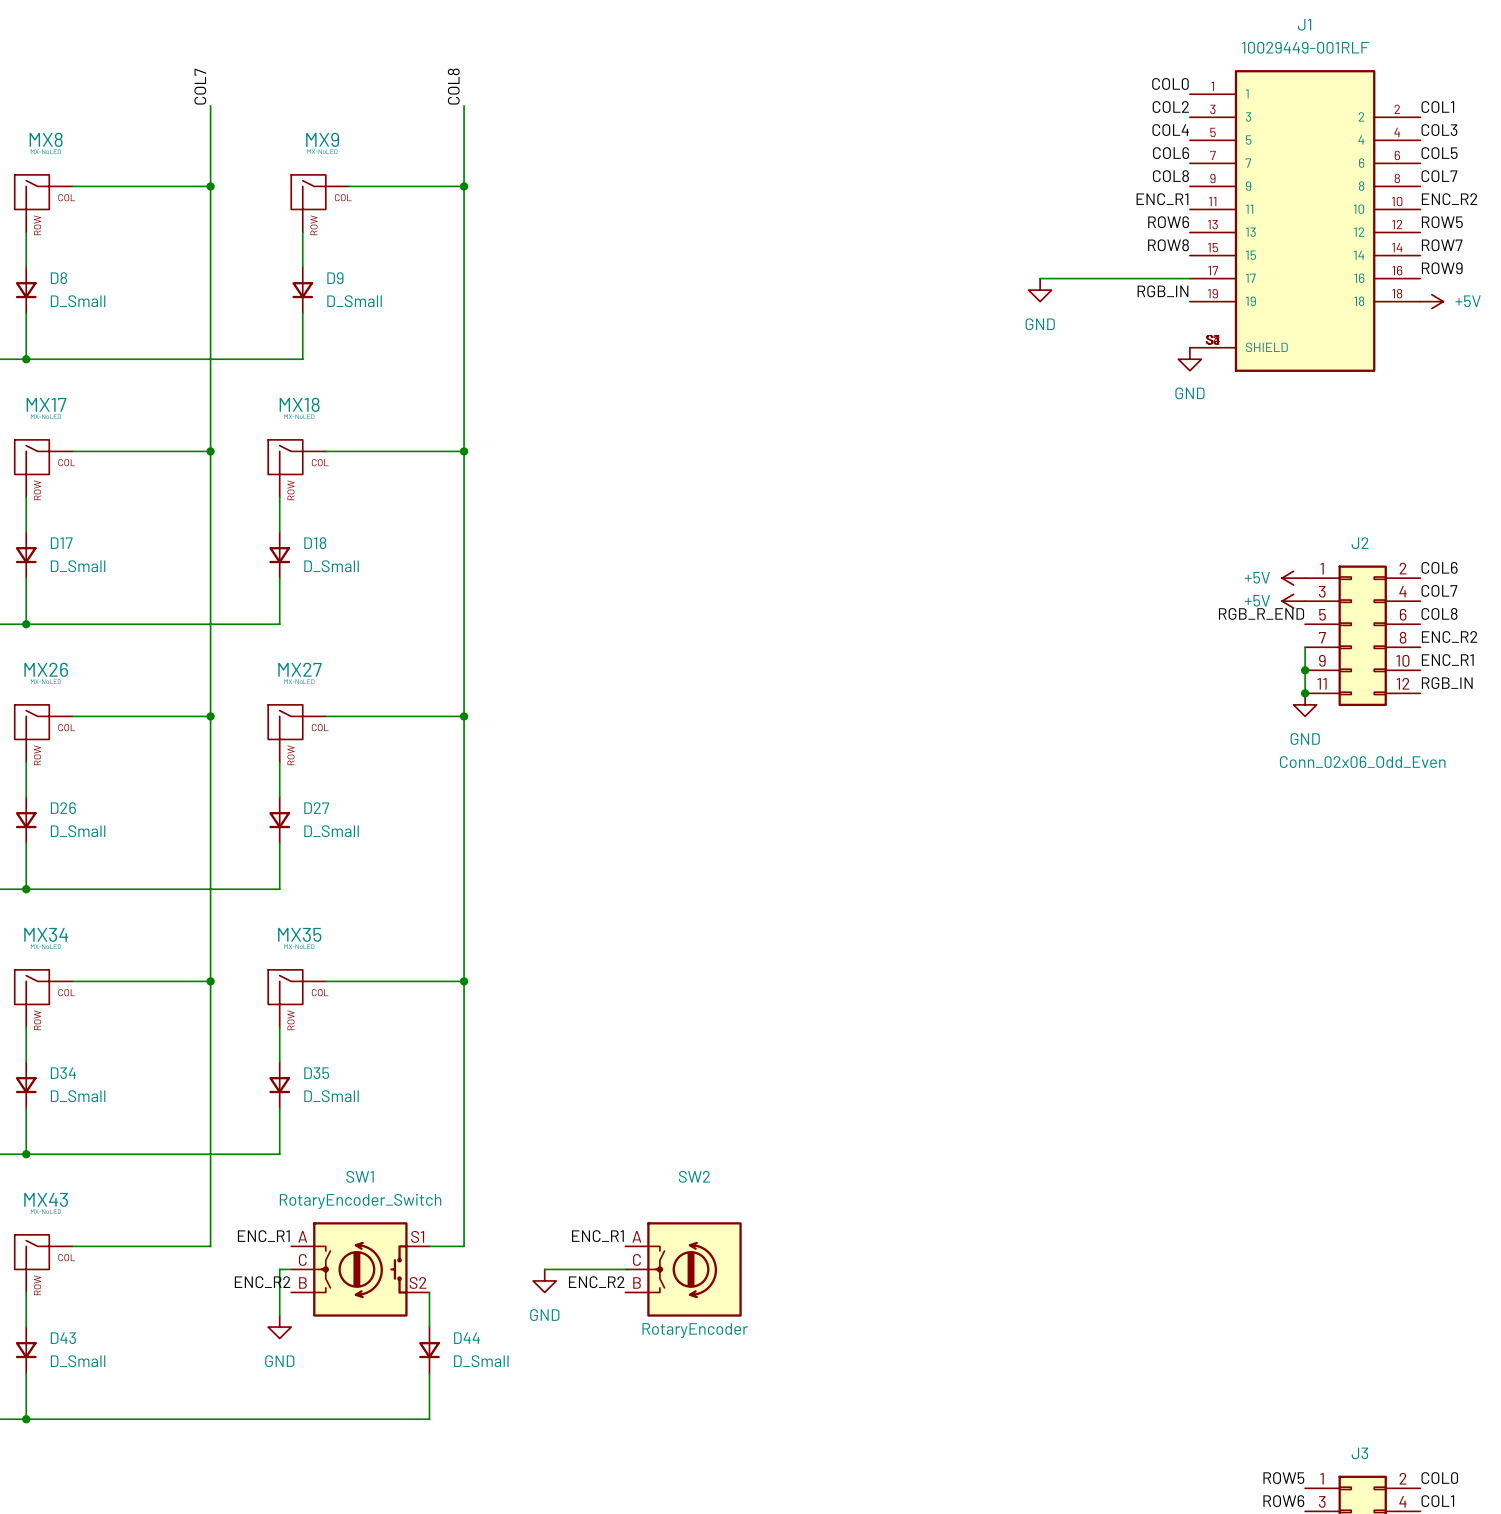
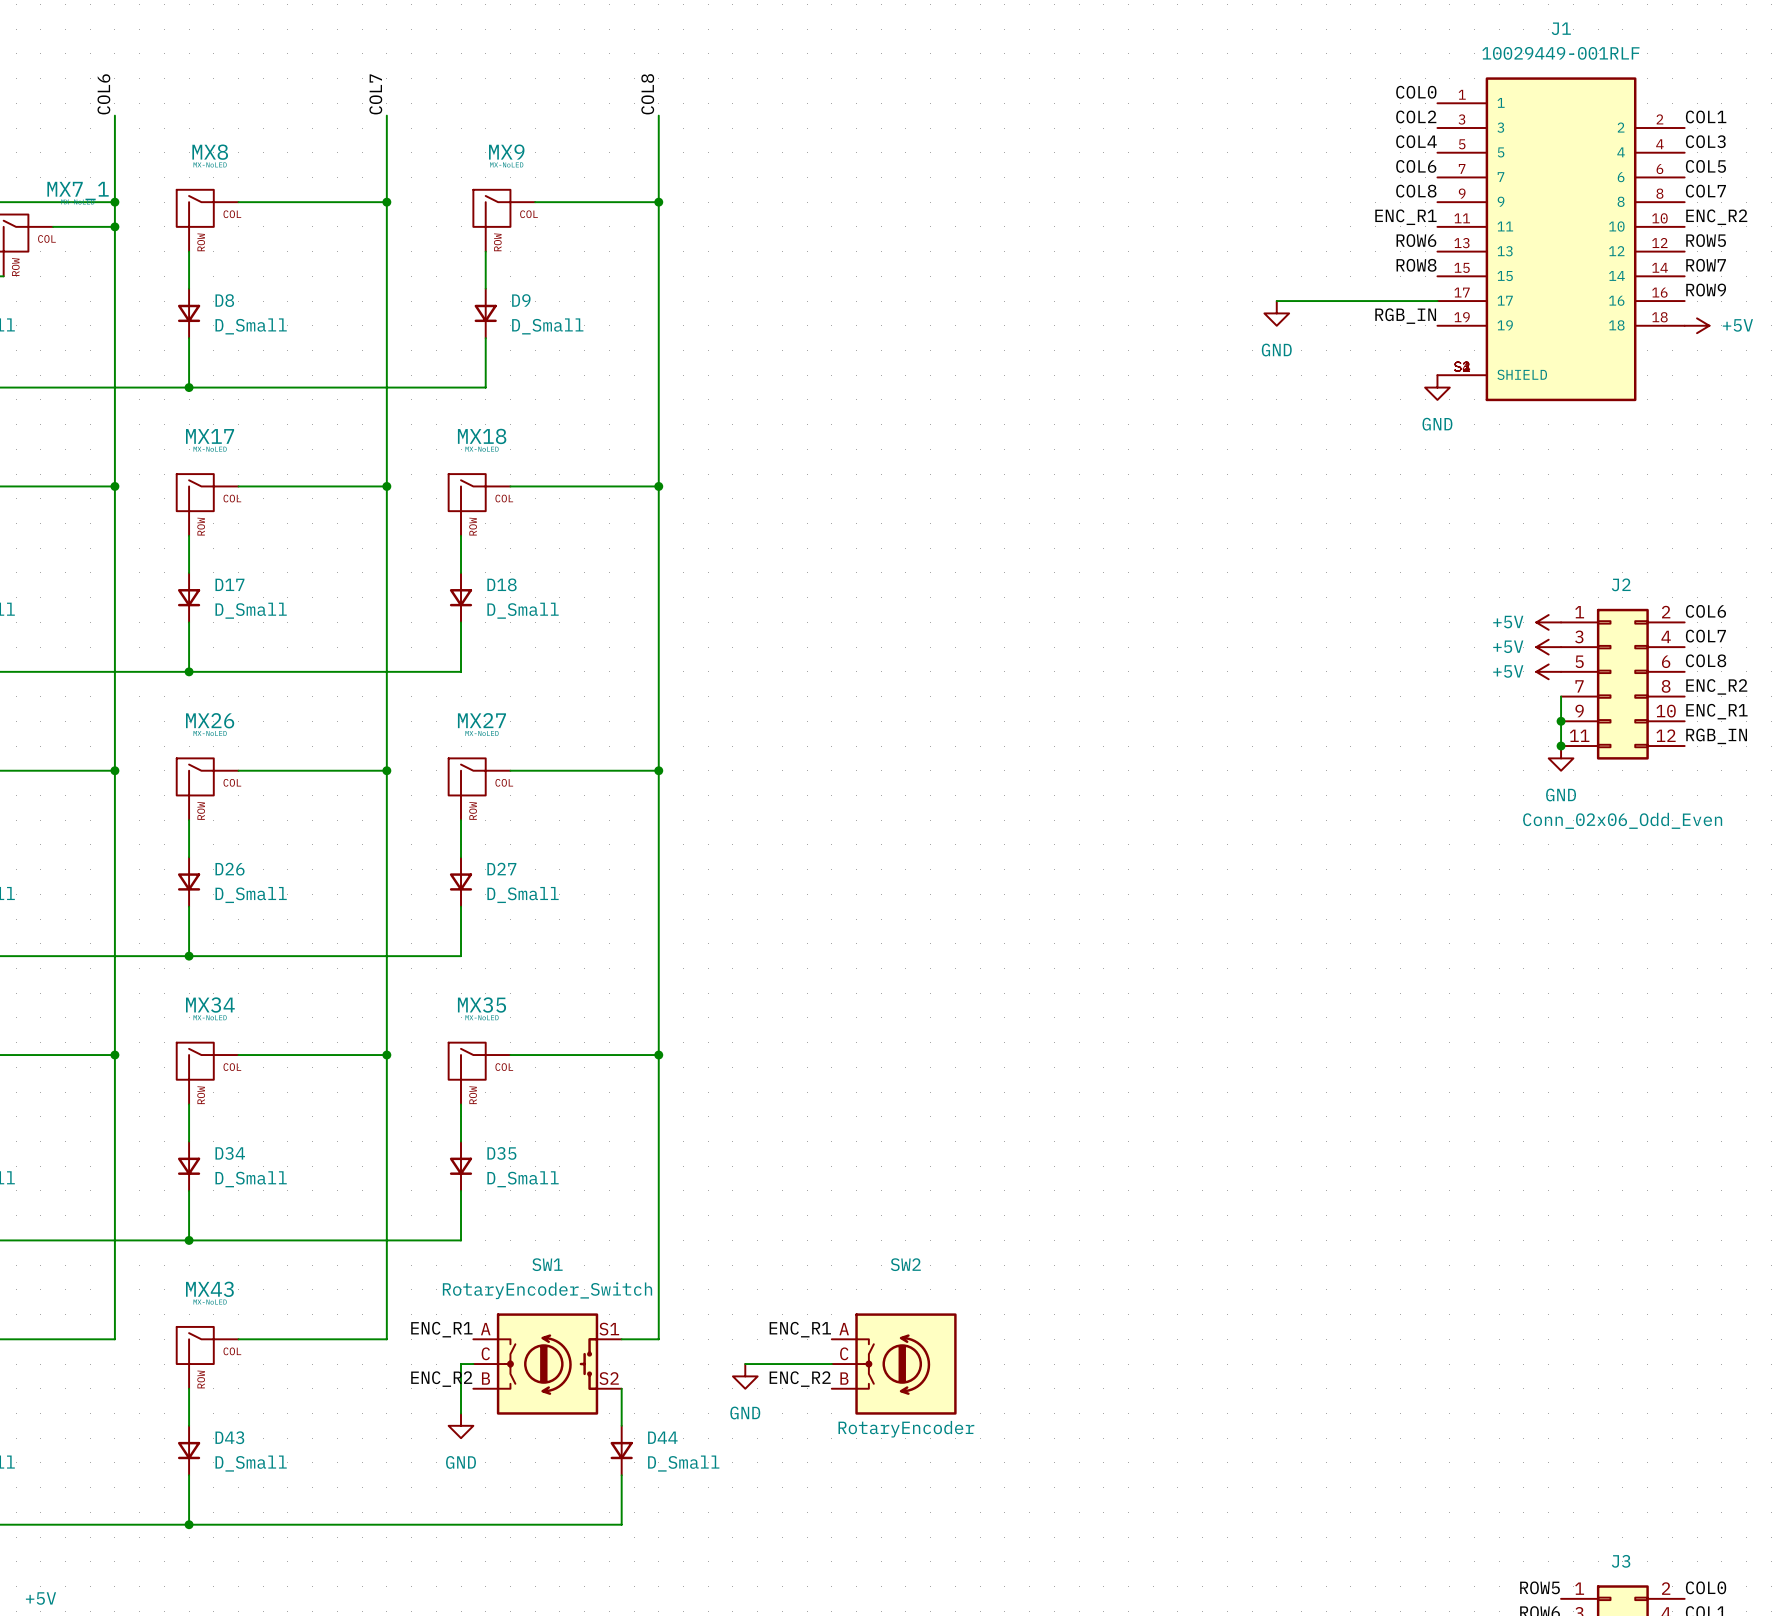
label: RGB_R_END (1261, 613) -> none
power symbol: none -> +5V (1548, 671)

